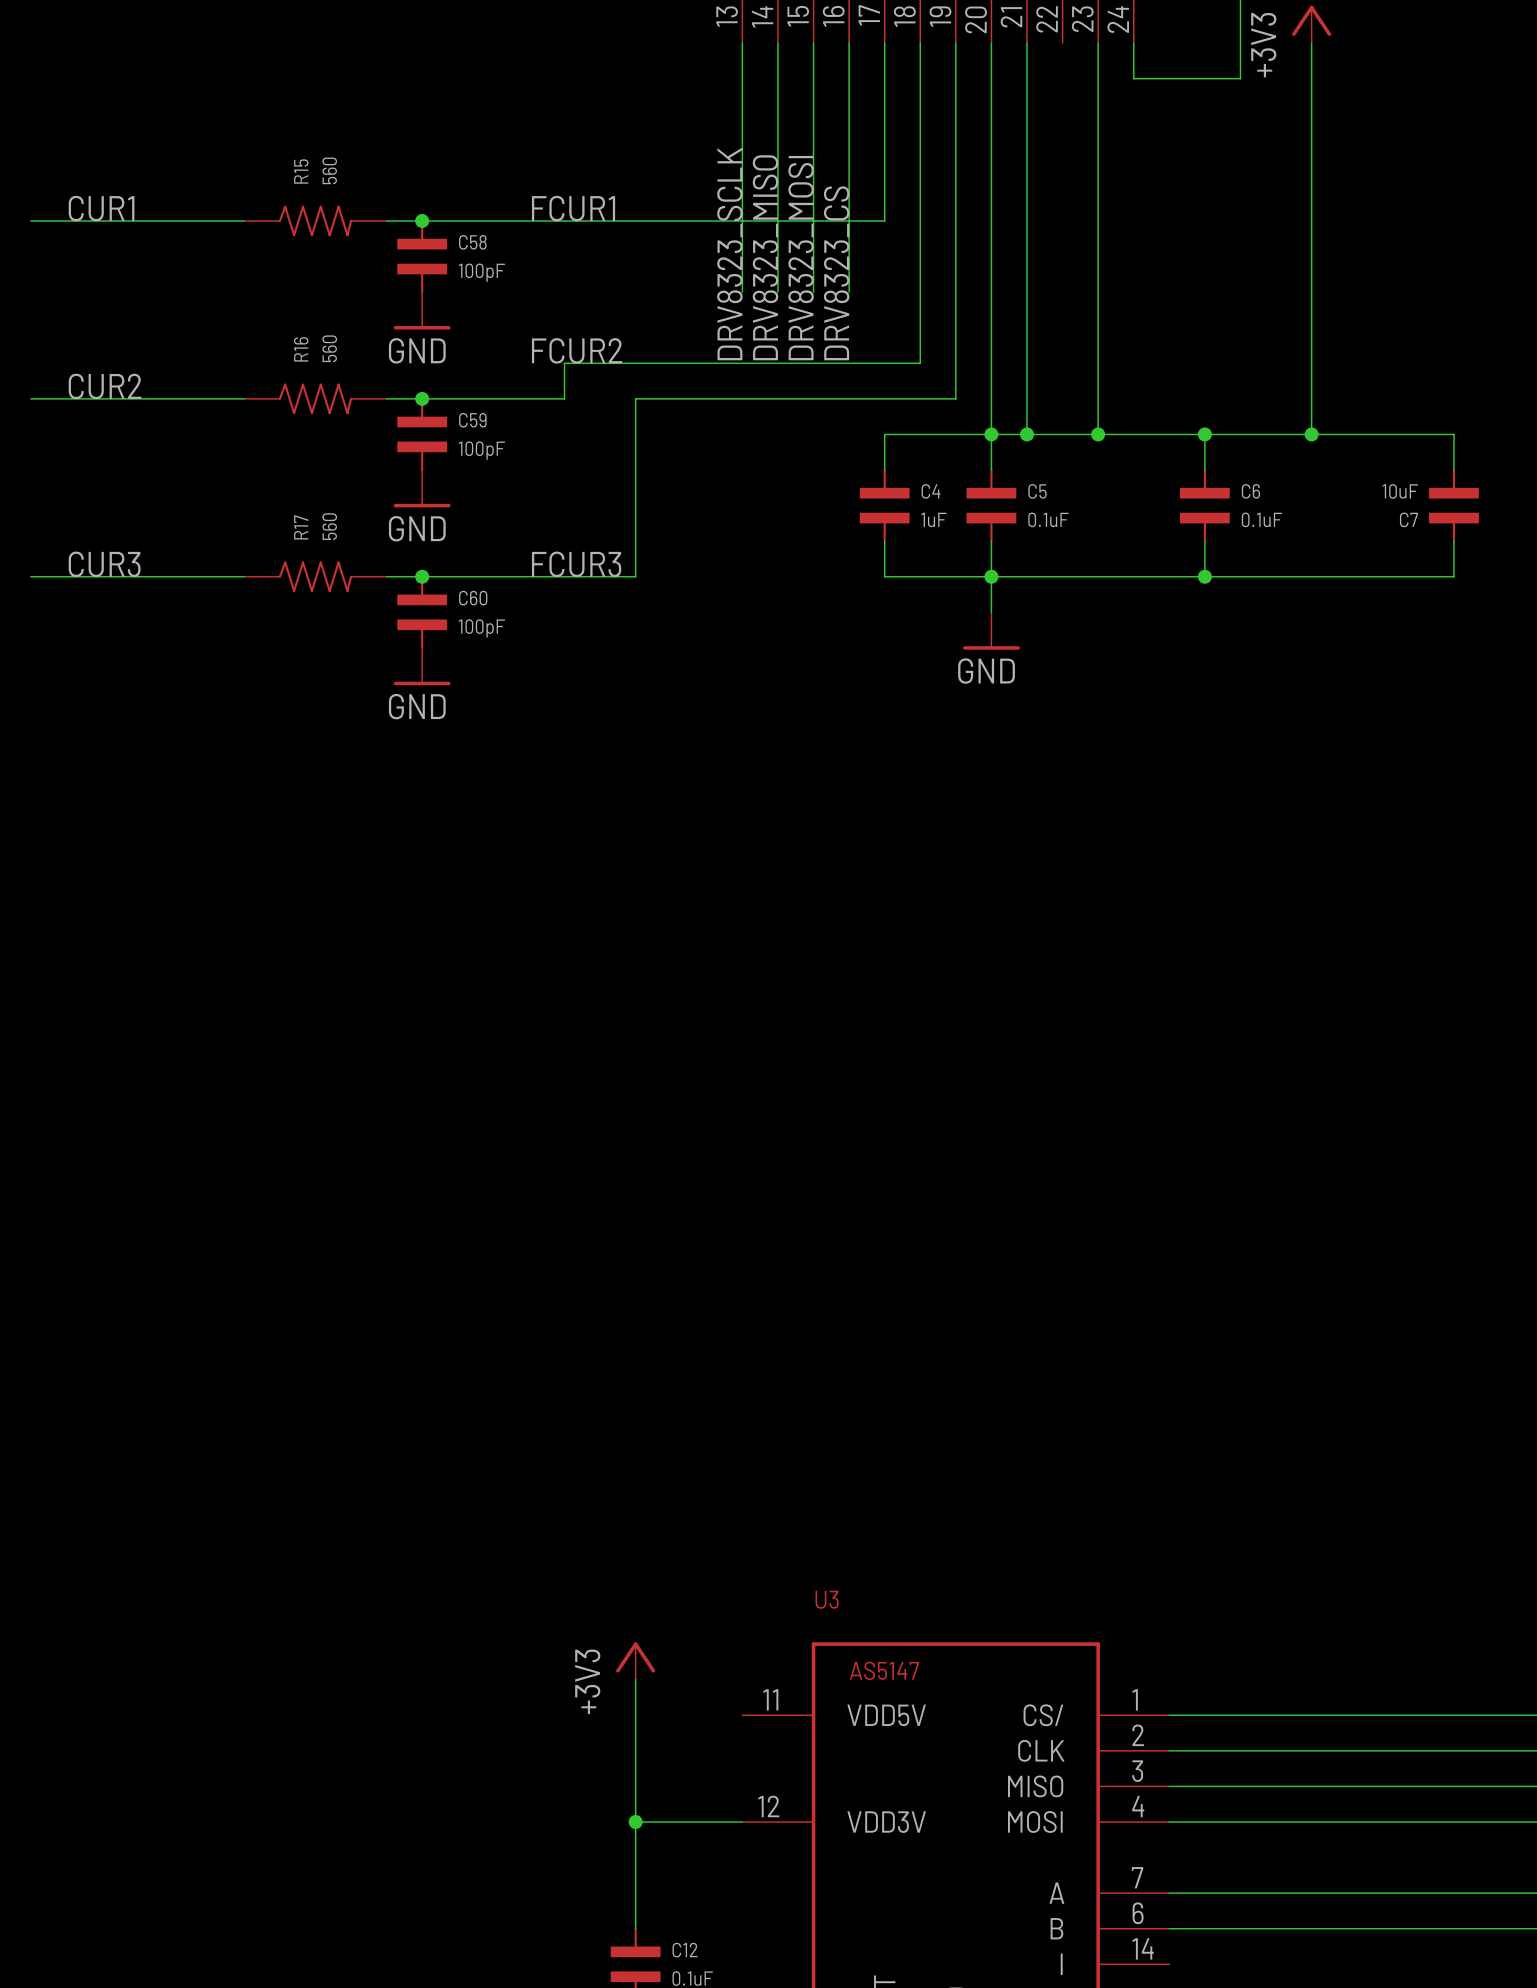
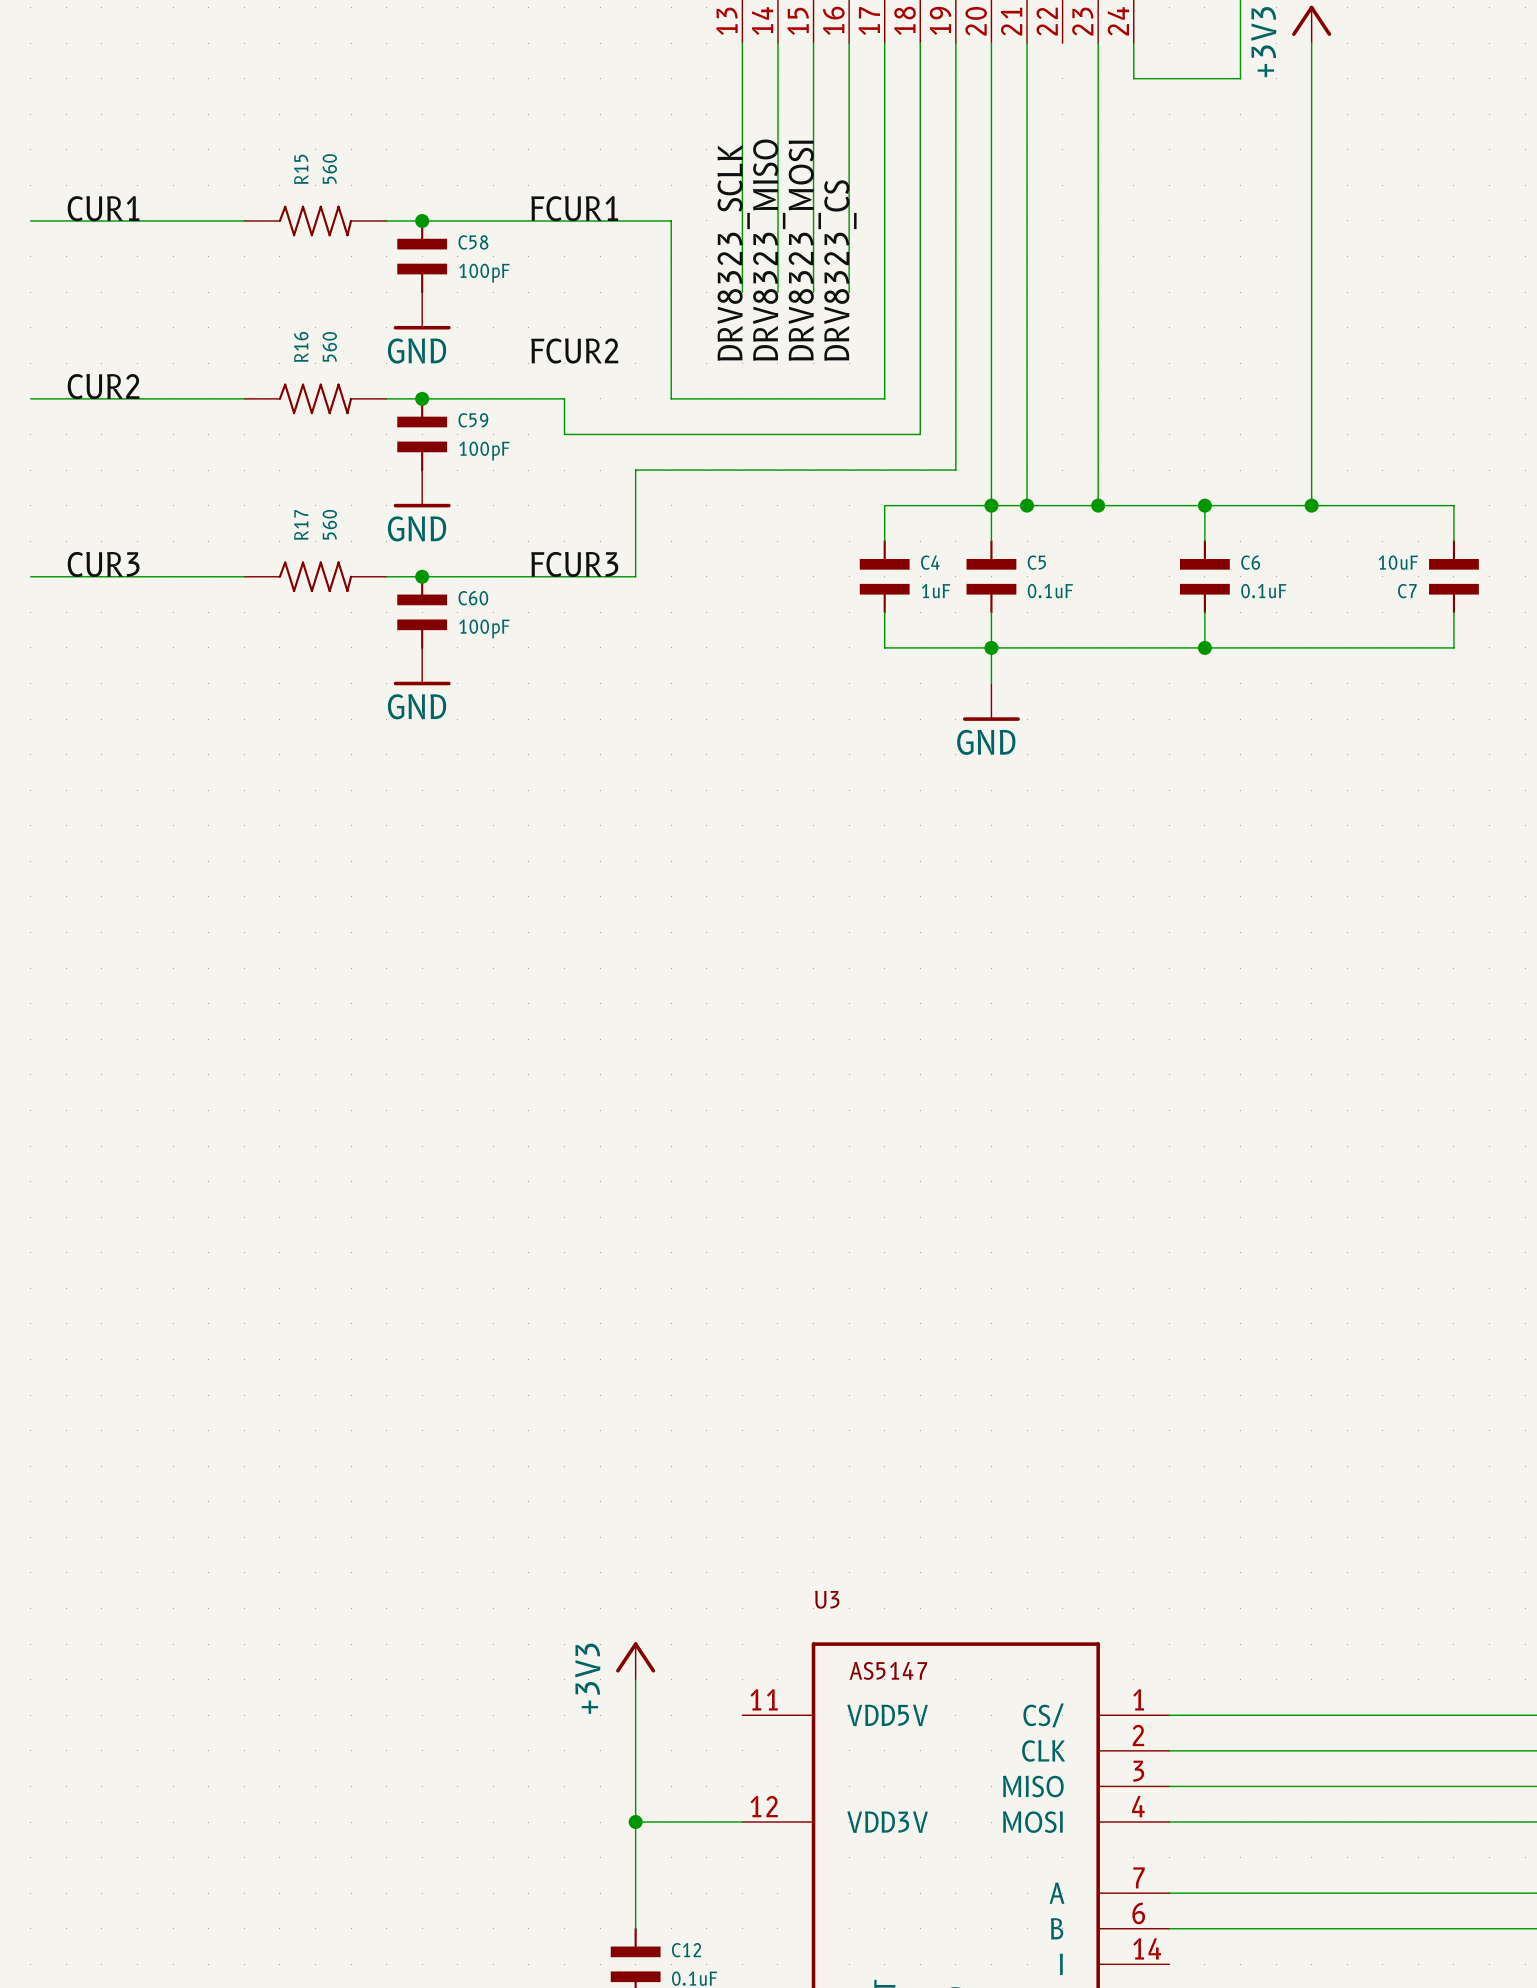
wire: (671, 220) (884, 220) -> none
wire: (920, 363) (564, 363) (564, 398) -> (884, 434) (564, 434) (564, 398)
wire: (671, 398) (635, 398) (635, 470) -> (671, 398) (671, 220)
wire: (884, 398) (955, 398) -> (884, 398) (884, 220)
wire: none -> (955, 398) (955, 470) (635, 470)
wire: (884, 434) (884, 470) -> none
wire: (920, 434) (1453, 434) (1453, 470) -> (920, 434) (920, 363)
junction: (991, 434) -> none
wire: none -> (1027, 434) (1027, 505)
junction: (1027, 434) -> none
wire: none -> (1098, 434) (1098, 505)
junction: (1098, 434) -> none
wire: (1204, 434) (1204, 470) -> (1204, 612) (1204, 647)
junction: (1204, 434) -> none
wire: none -> (1311, 434) (1311, 505)
junction: (1311, 434) -> none
C4 position: (884, 505) -> (884, 576)
C5 position: (991, 505) -> (991, 576)
junction: none -> (991, 505)
junction: none -> (1027, 505)
junction: none -> (1098, 505)
C6 position: (1204, 505) -> (1204, 576)
junction: none -> (1204, 505)
junction: none -> (1311, 505)
C7 position: (1453, 505) -> (1453, 576)
wire: (884, 541) (884, 576) (1453, 576) (1453, 541) -> (884, 541) (884, 505) (1453, 505) (1453, 541)
junction: (991, 576) -> none
junction: (1204, 576) -> none
wire: none -> (884, 612) (884, 647) (1453, 647) (1453, 612)
power symbol position: GND (991, 631) -> GND (991, 702)
junction: none -> (991, 647)
junction: none -> (1204, 647)

